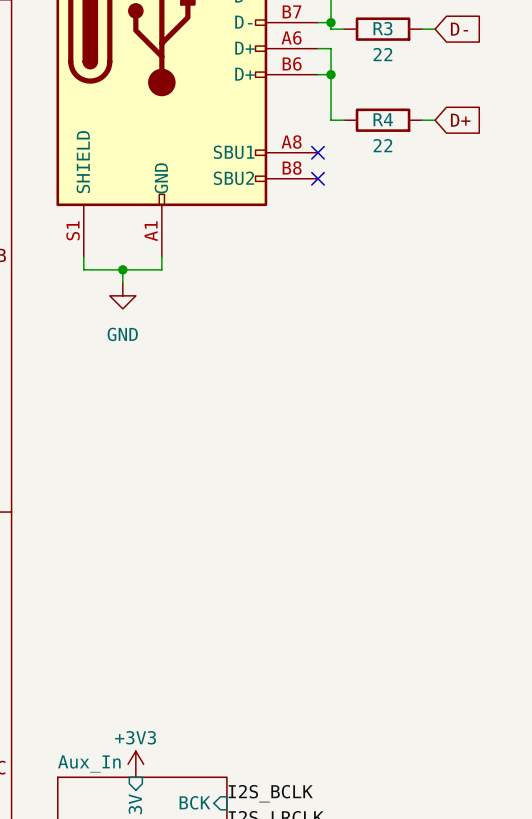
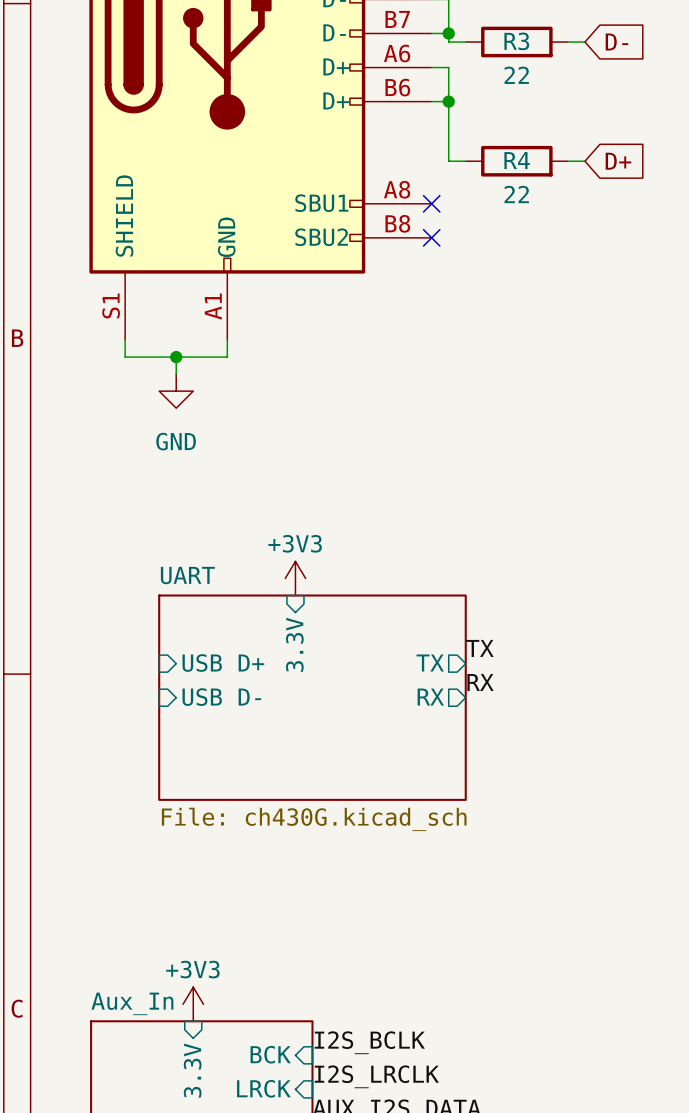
power symbol: none -> +3V3 (295, 578)
sheet pin: none -> 3.3V (294, 644)
label: none -> TX (479, 648)
sheet pin: none -> USB D+ (223, 663)
sheet pin: none -> TX (430, 662)
label: none -> RX (480, 682)
sheet pin: none -> USB D- (221, 697)
sheet pin: none -> RX (430, 697)
sheet UART: none -> File: ch430G.kicad_sch (312, 697)

